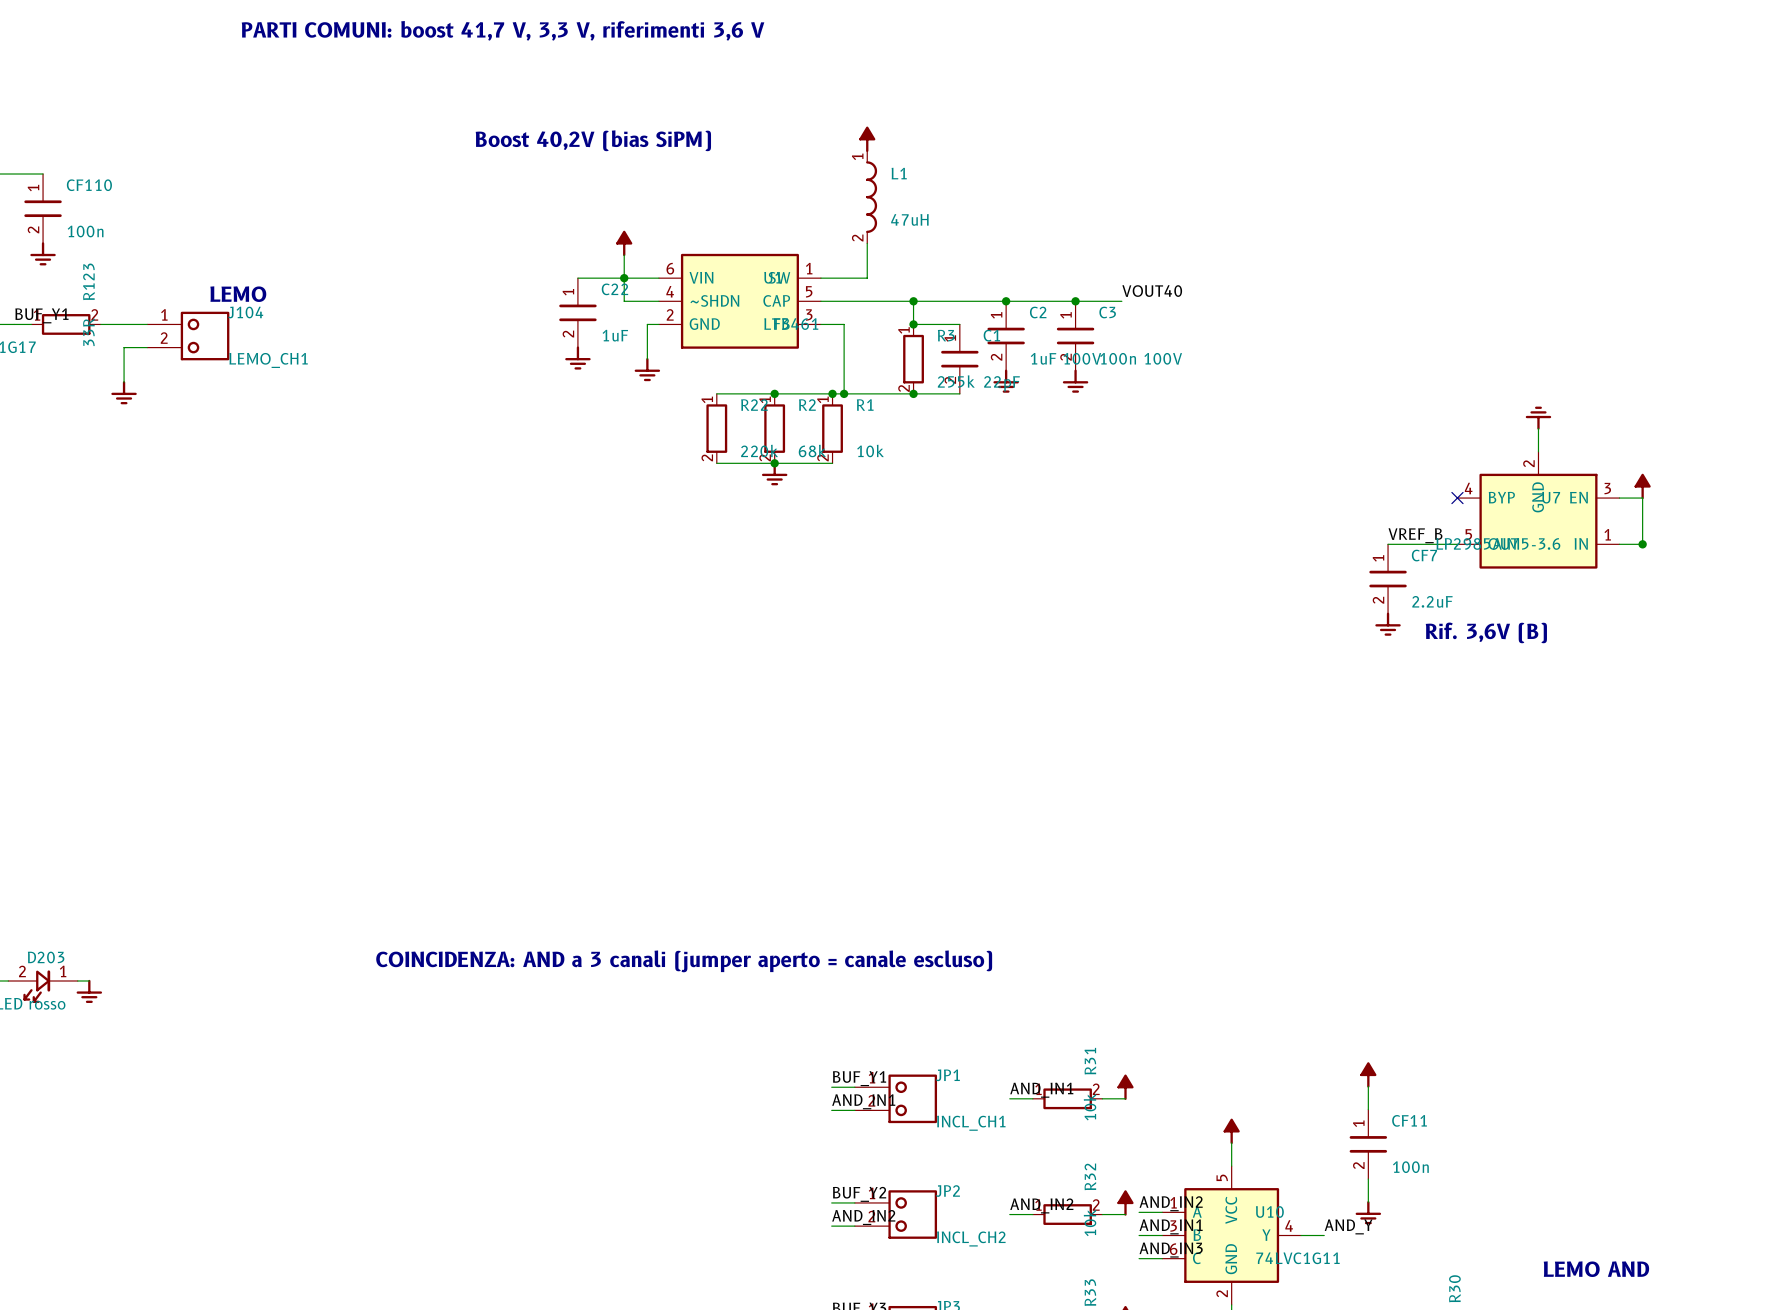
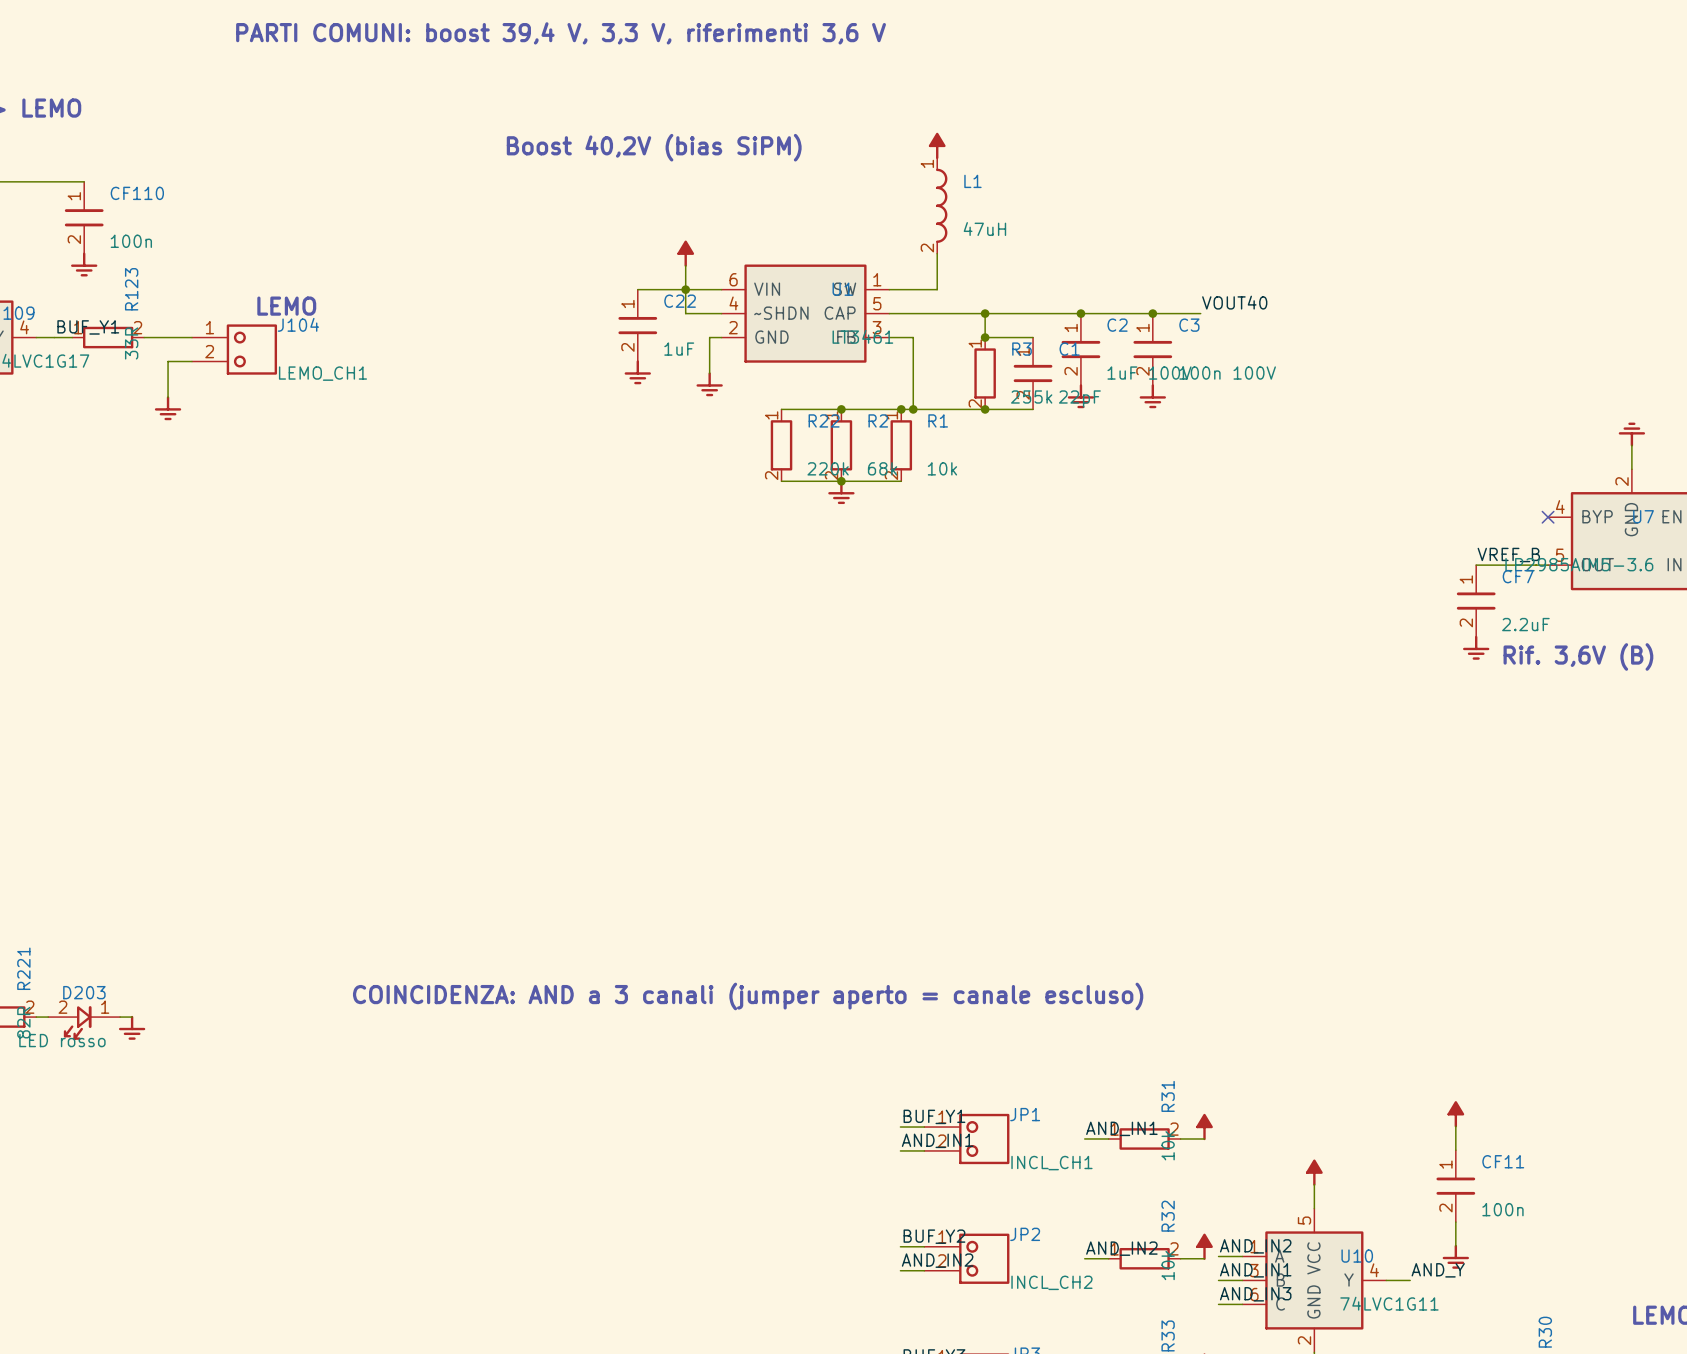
text: PARTI COMUNI: boost 41,7 V, 3,3 V, riferimenti 3,6 V (503, 30) -> PARTI COMUNI: boost 39,4 V, 3,3 V, riferimenti 3,6 V (561, 33)

